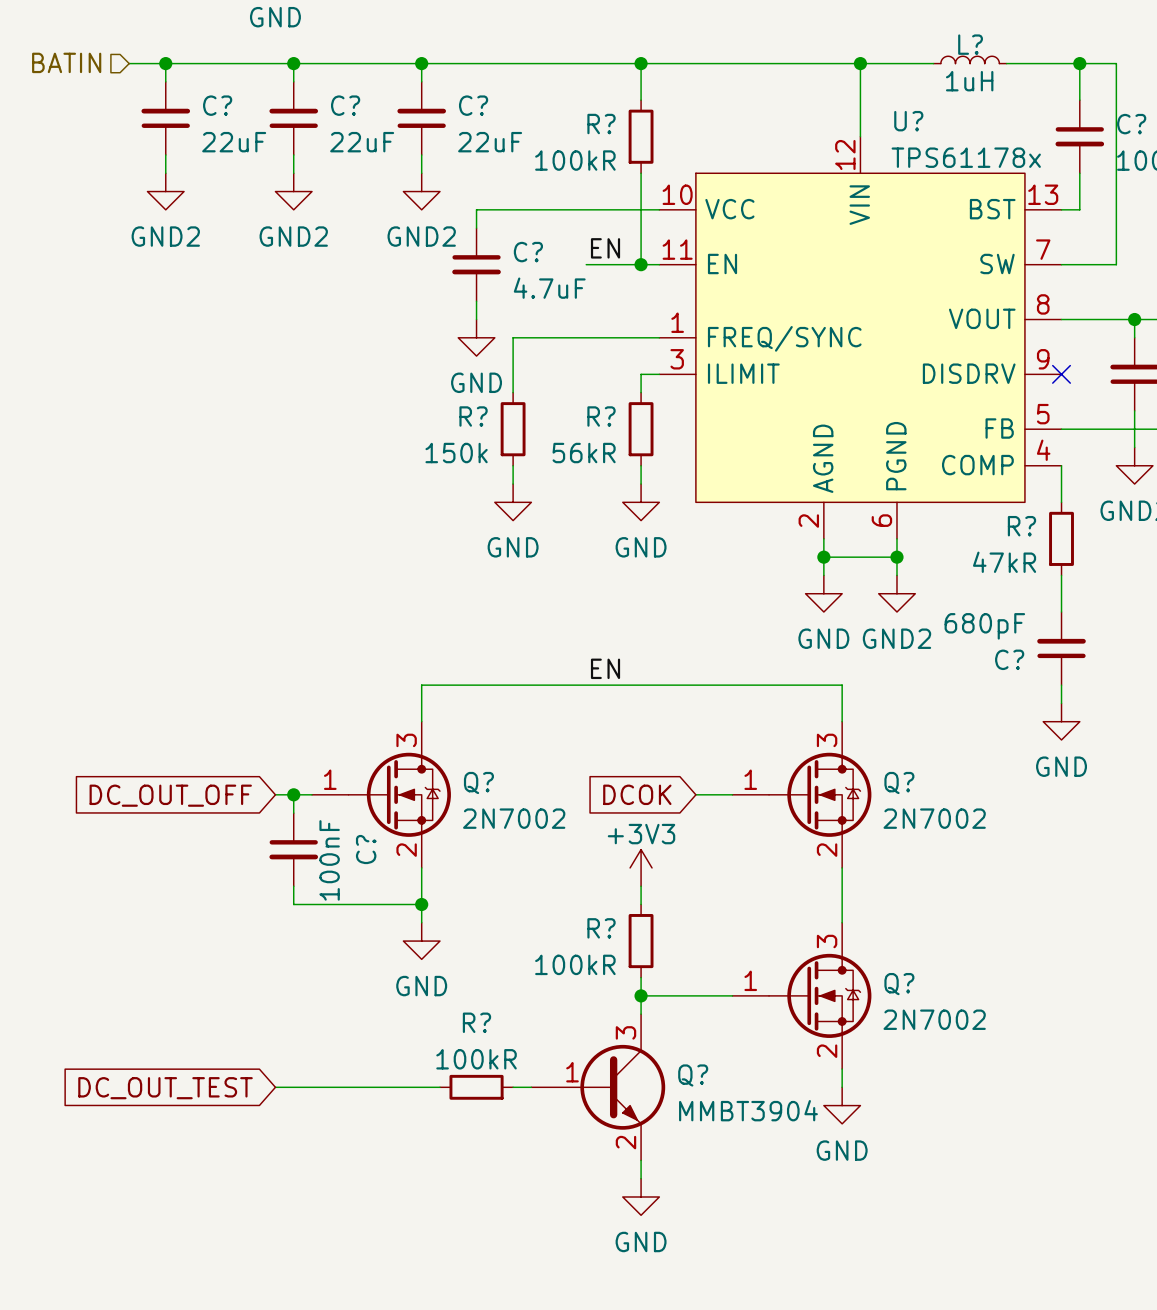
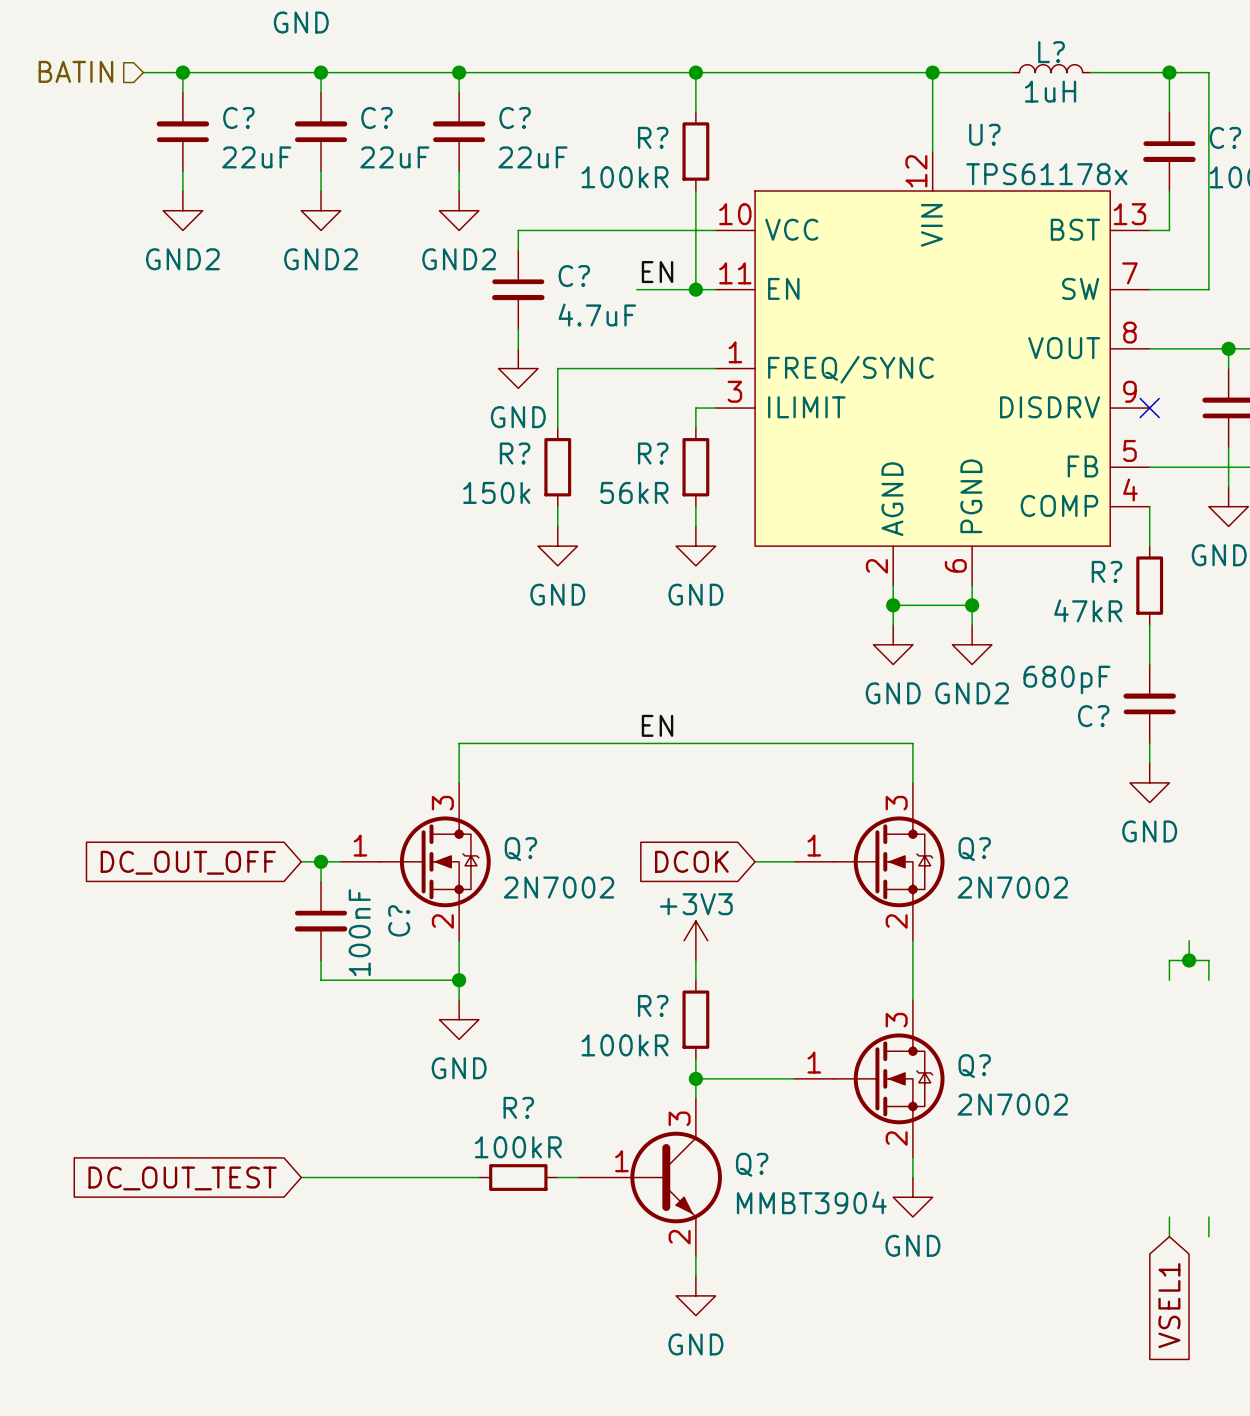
wire: none -> (1189, 940) (1189, 960)
junction: none -> (1189, 960)
wire: none -> (1169, 980) (1169, 960) (1208, 960) (1208, 980)
wire: none -> (1169, 1216) (1169, 1236)
wire: none -> (1208, 1216) (1208, 1236)
global label: none -> VSEL1 (1169, 1305)

